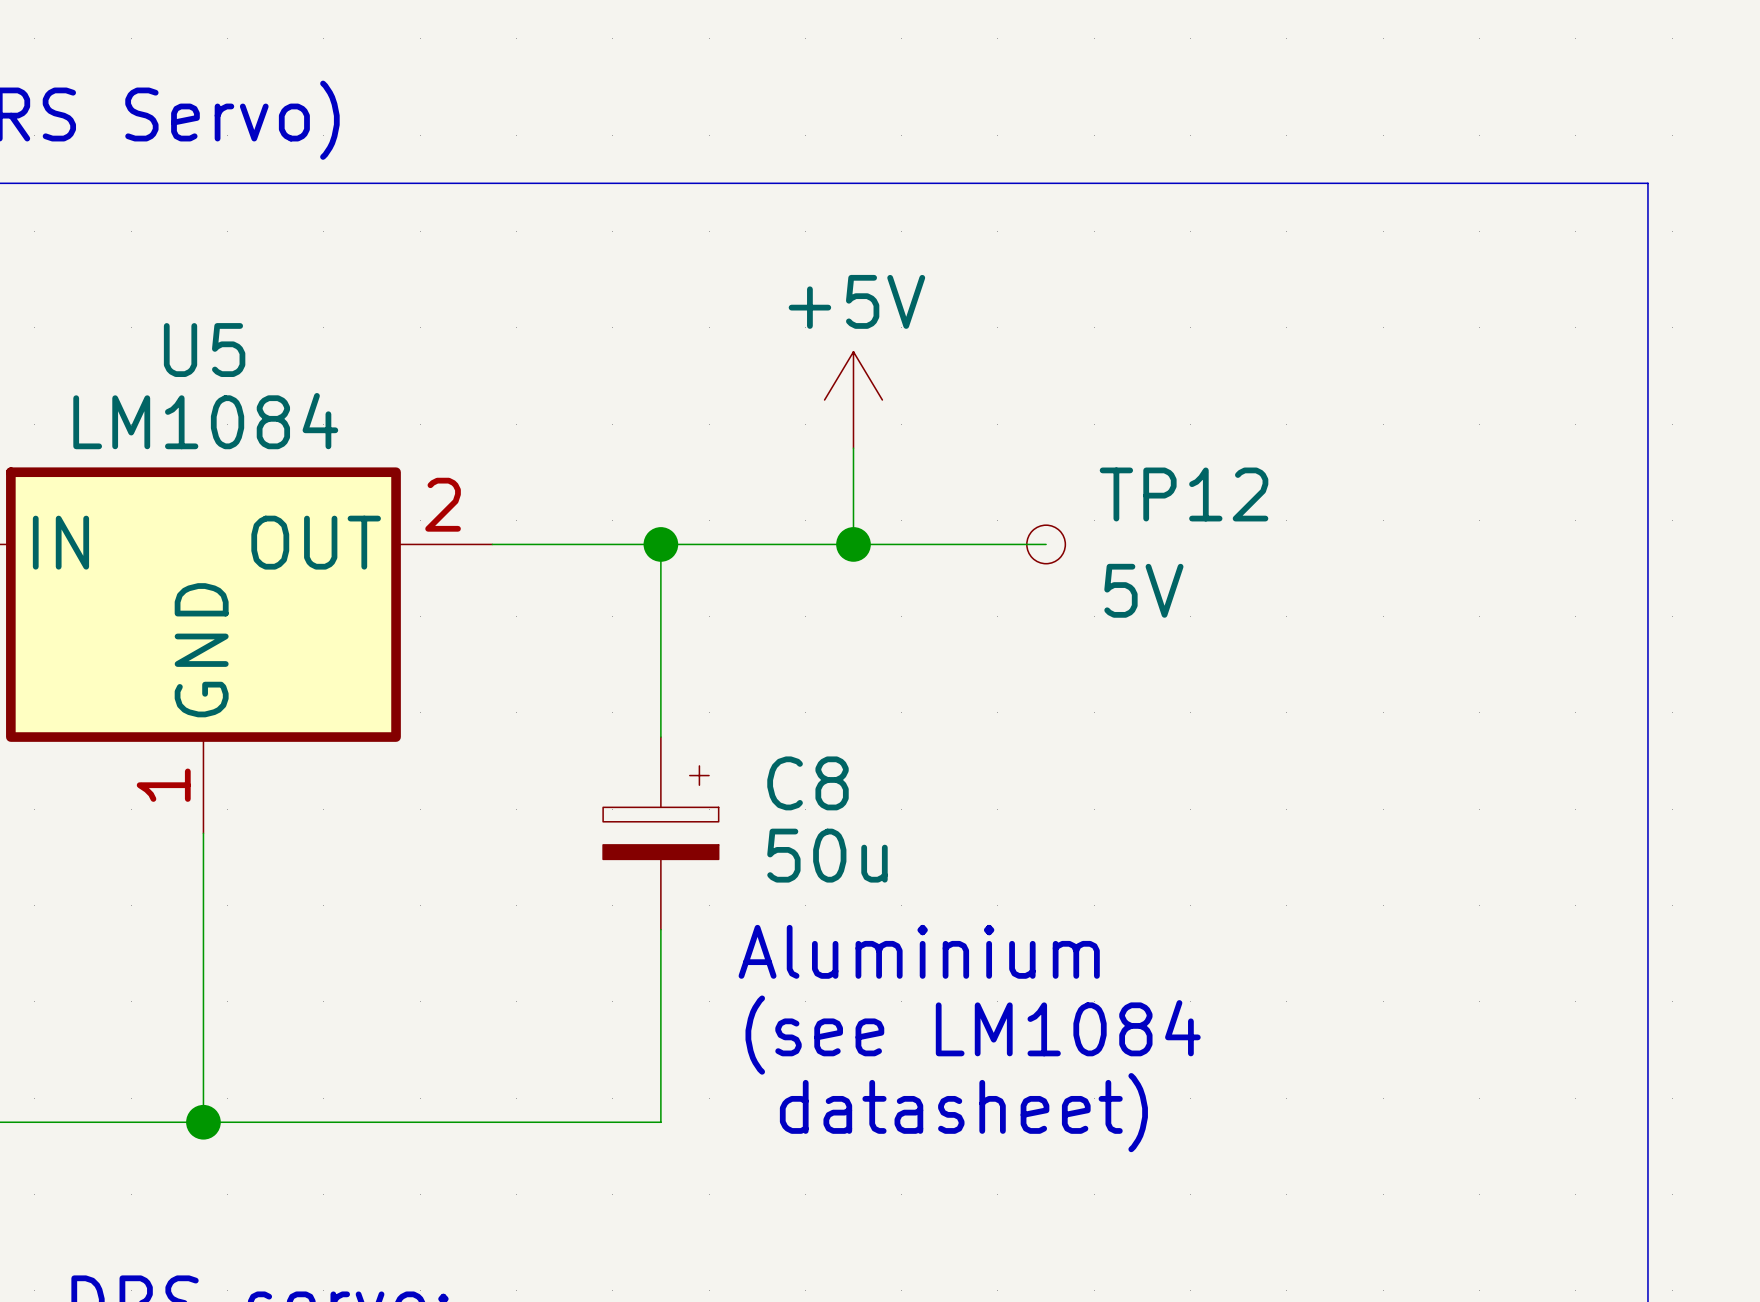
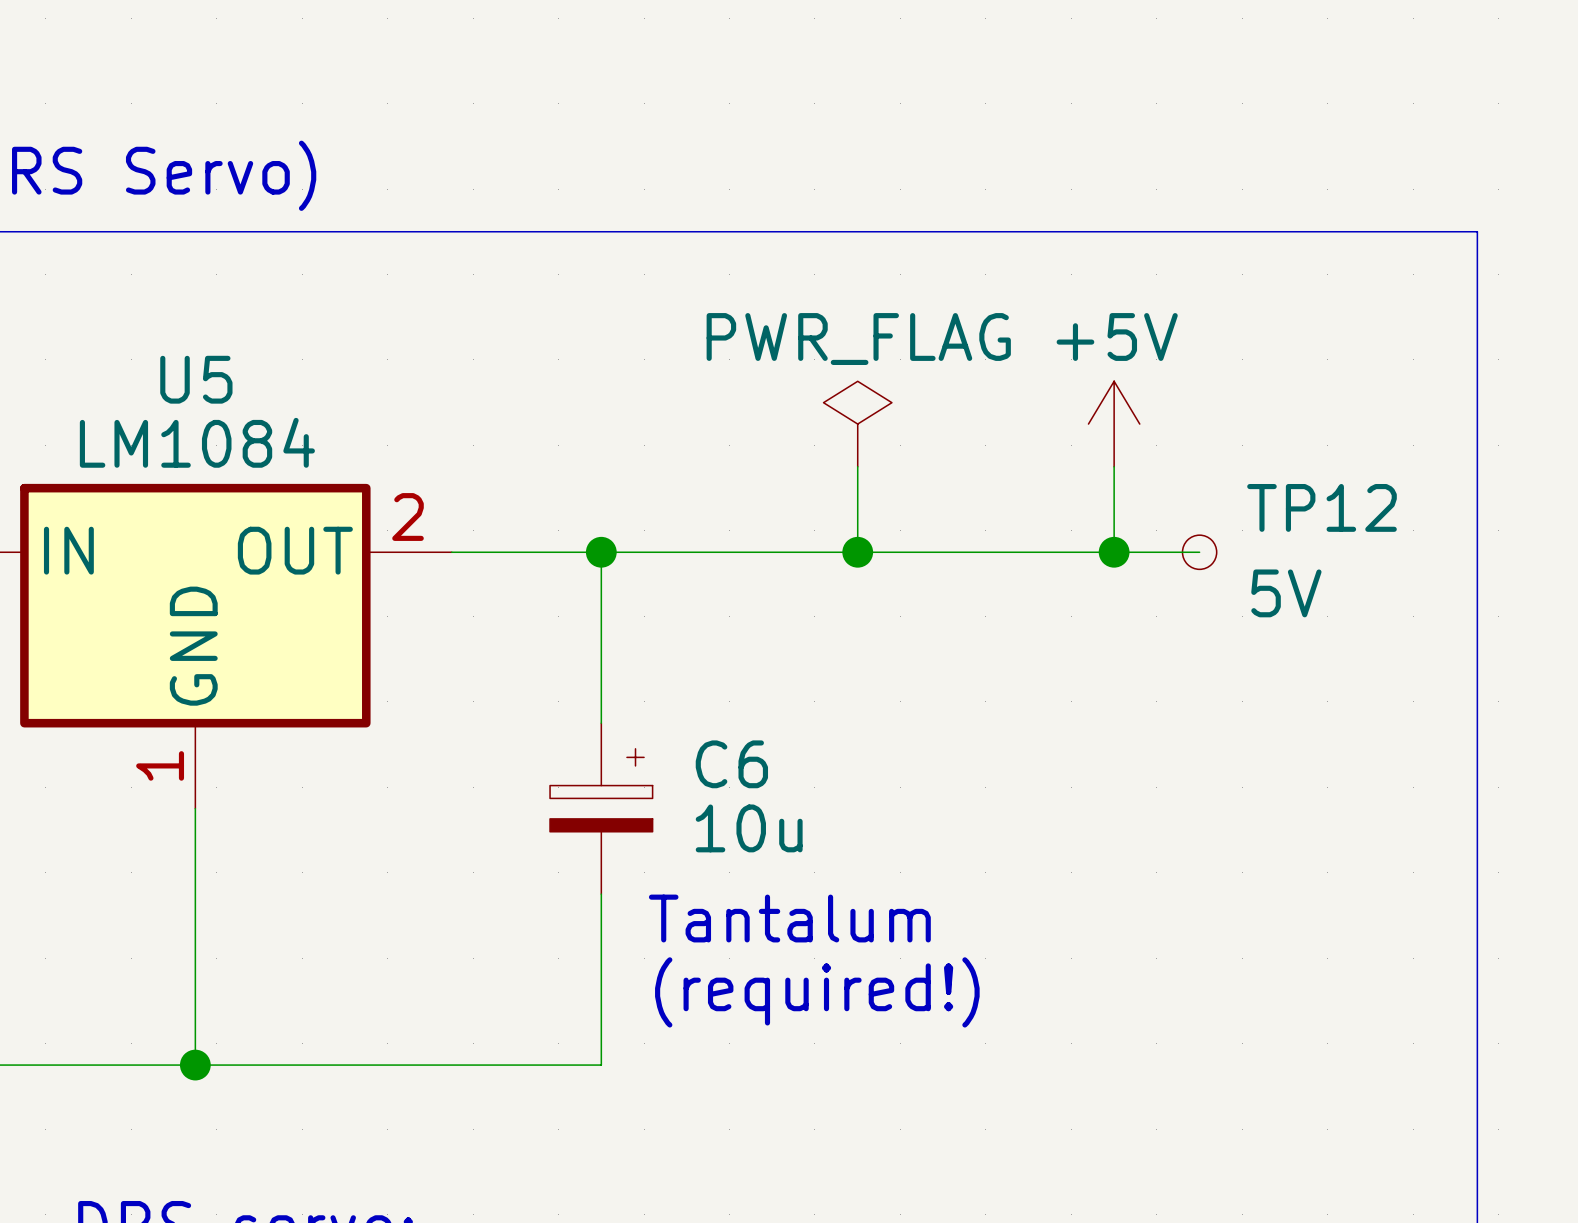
power symbol position: +5V (853, 399) -> +5V (1114, 424)
power symbol: none -> PWR_FLAG (857, 424)
wire: (853, 448) (853, 544) -> (857, 466) (857, 552)
wire: none -> (1114, 466) (1114, 552)
junction position: (853, 544) -> (857, 552)
wire: none -> (943, 552) (1199, 552)
TP12 position: (1046, 544) -> (1199, 552)
junction: none -> (1114, 552)
C8 name: C8 (807, 783) -> C6 (731, 764)
C8 value: 50u (827, 855) -> 10u (749, 828)
text: Aluminium (919, 951) -> Tantalum (789, 918)
text: (see LM1084 (973, 1035) -> (required!) (817, 992)
text: datasheet) (963, 1112) -> none

